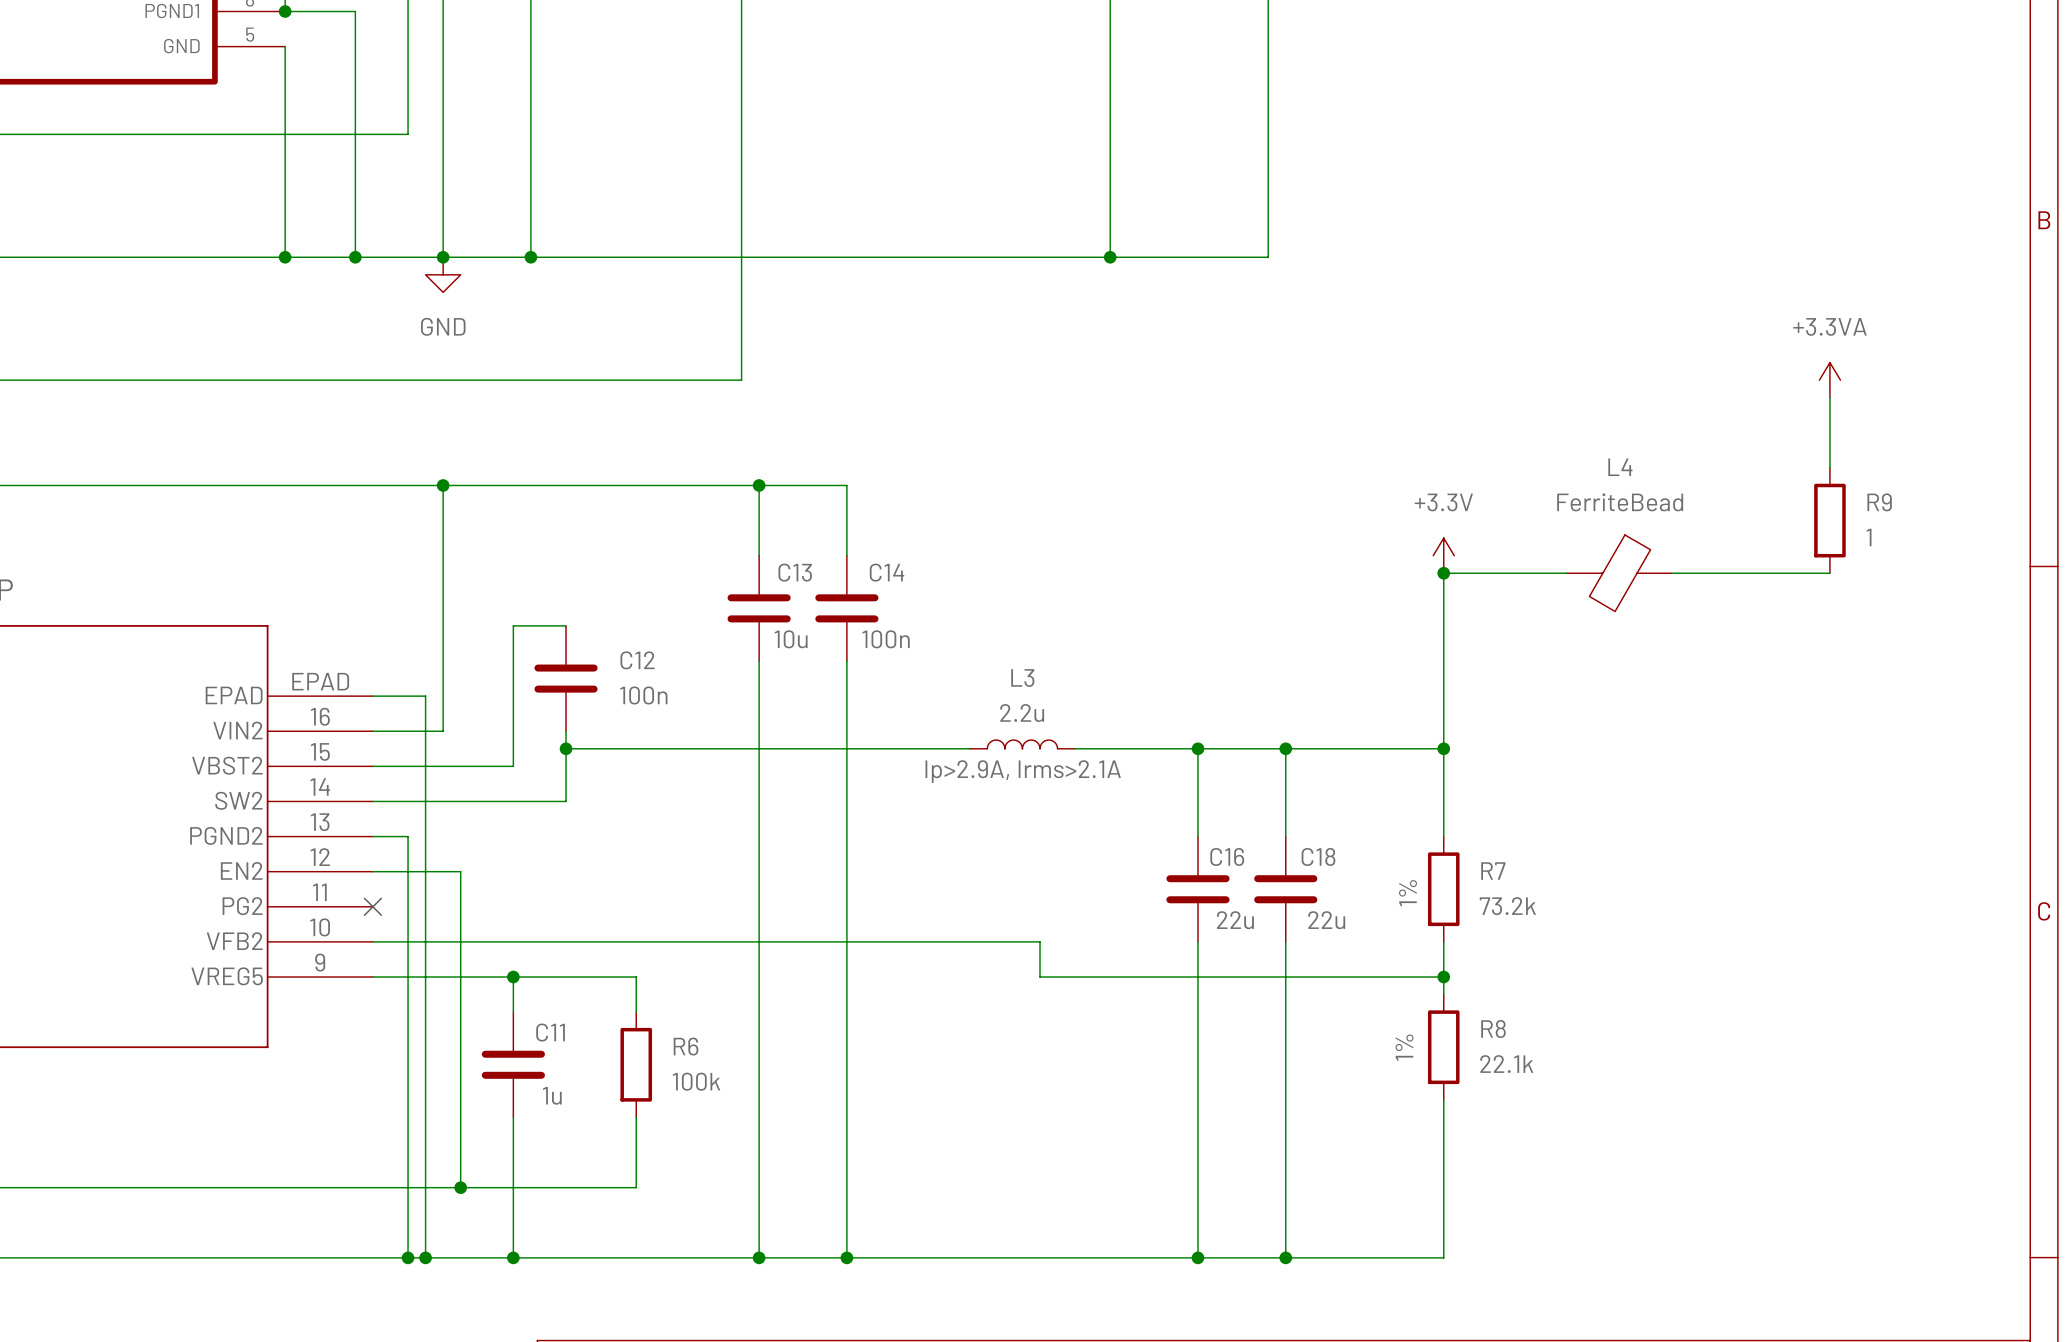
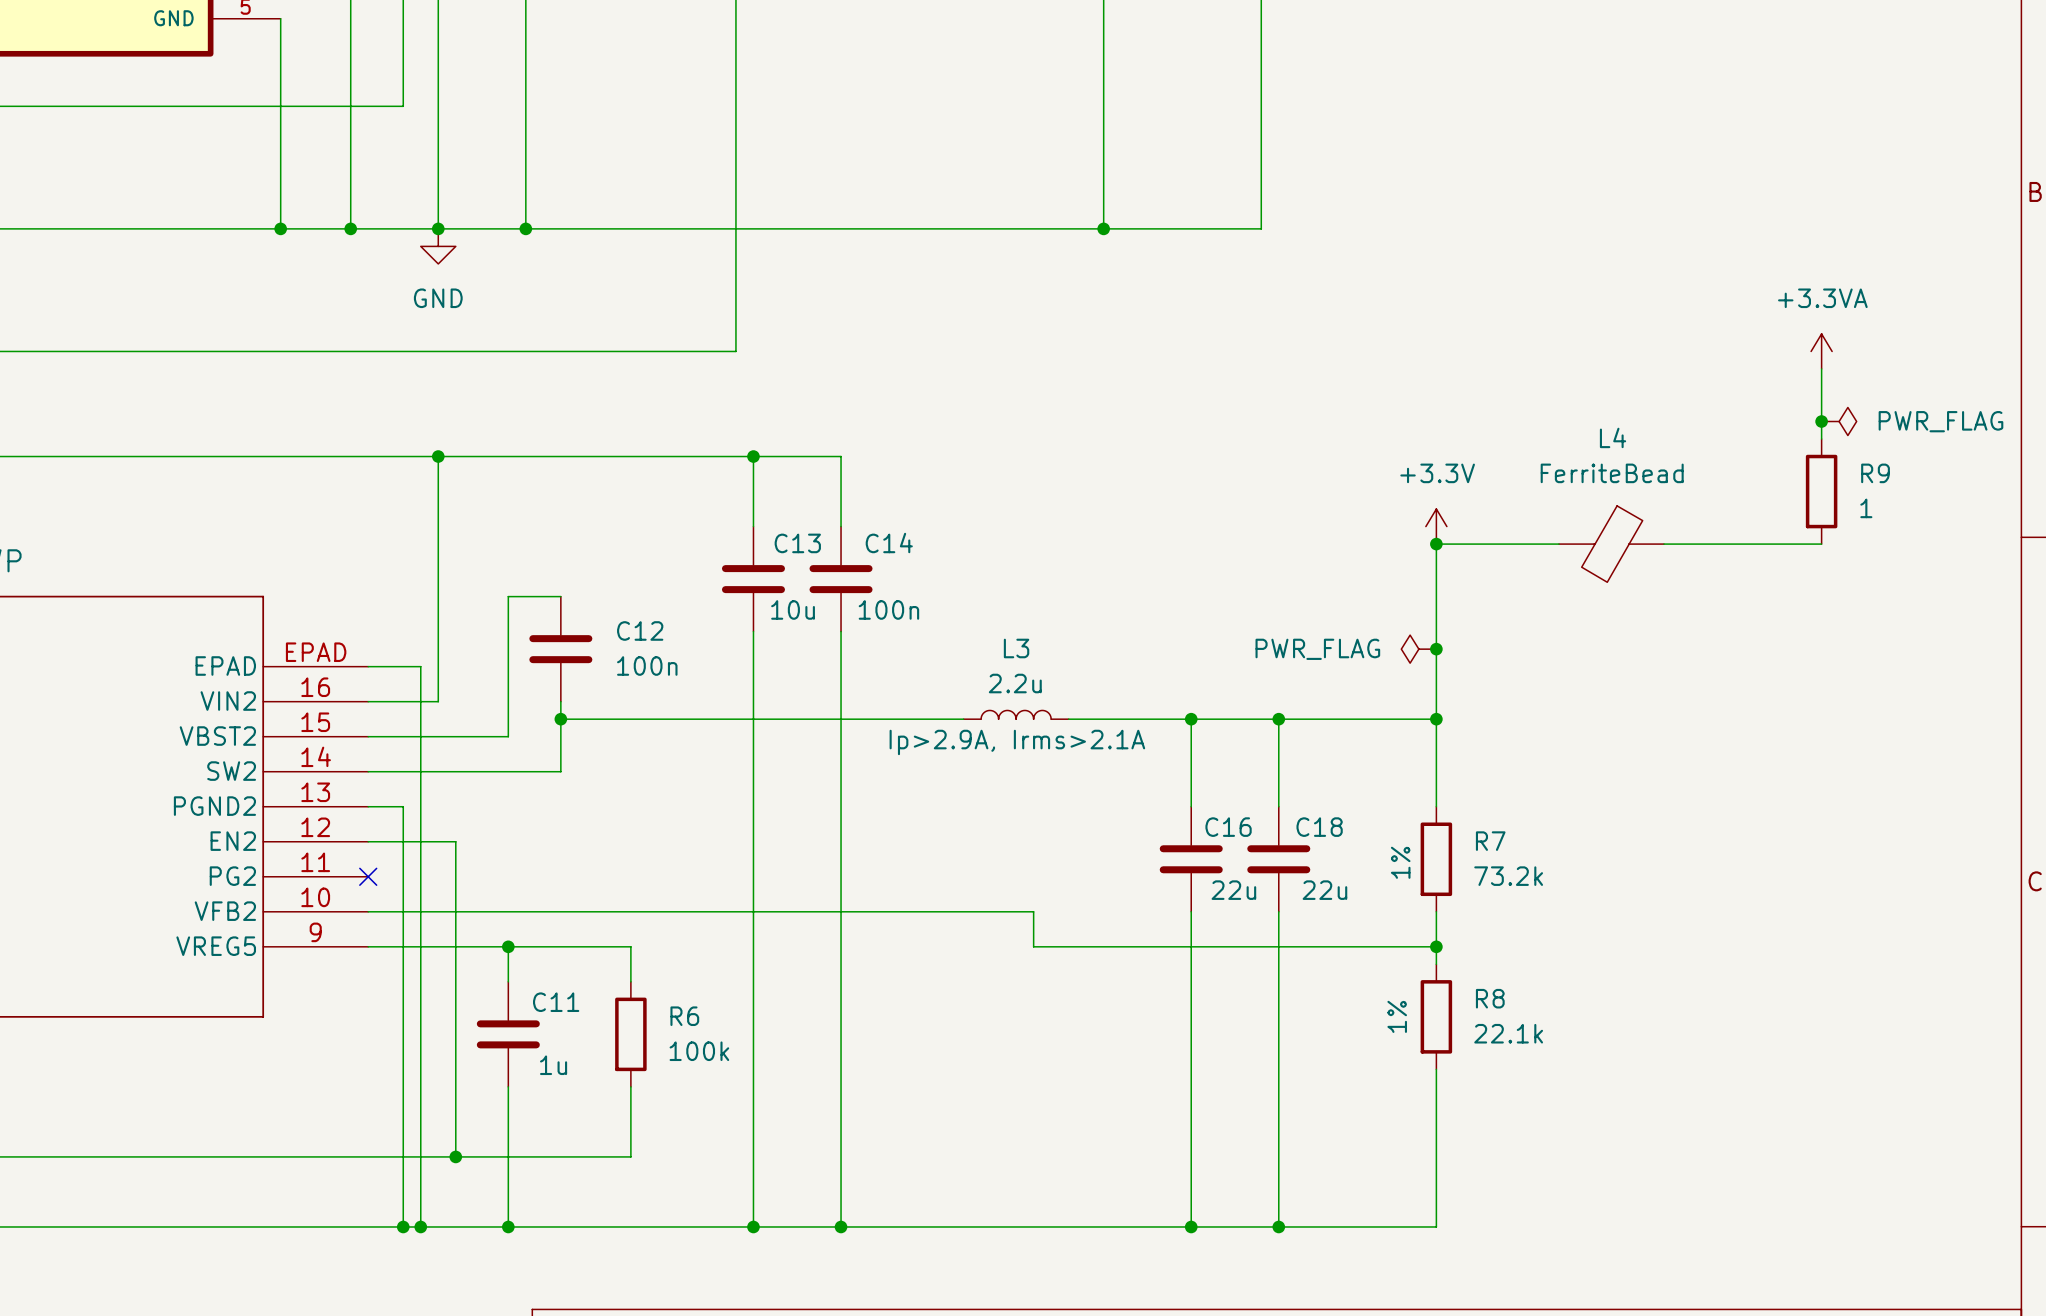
junction: none -> (1821, 421)
power symbol: none -> PWR_FLAG (1839, 421)
power symbol: none -> PWR_FLAG (1418, 649)
junction: none -> (1436, 649)

